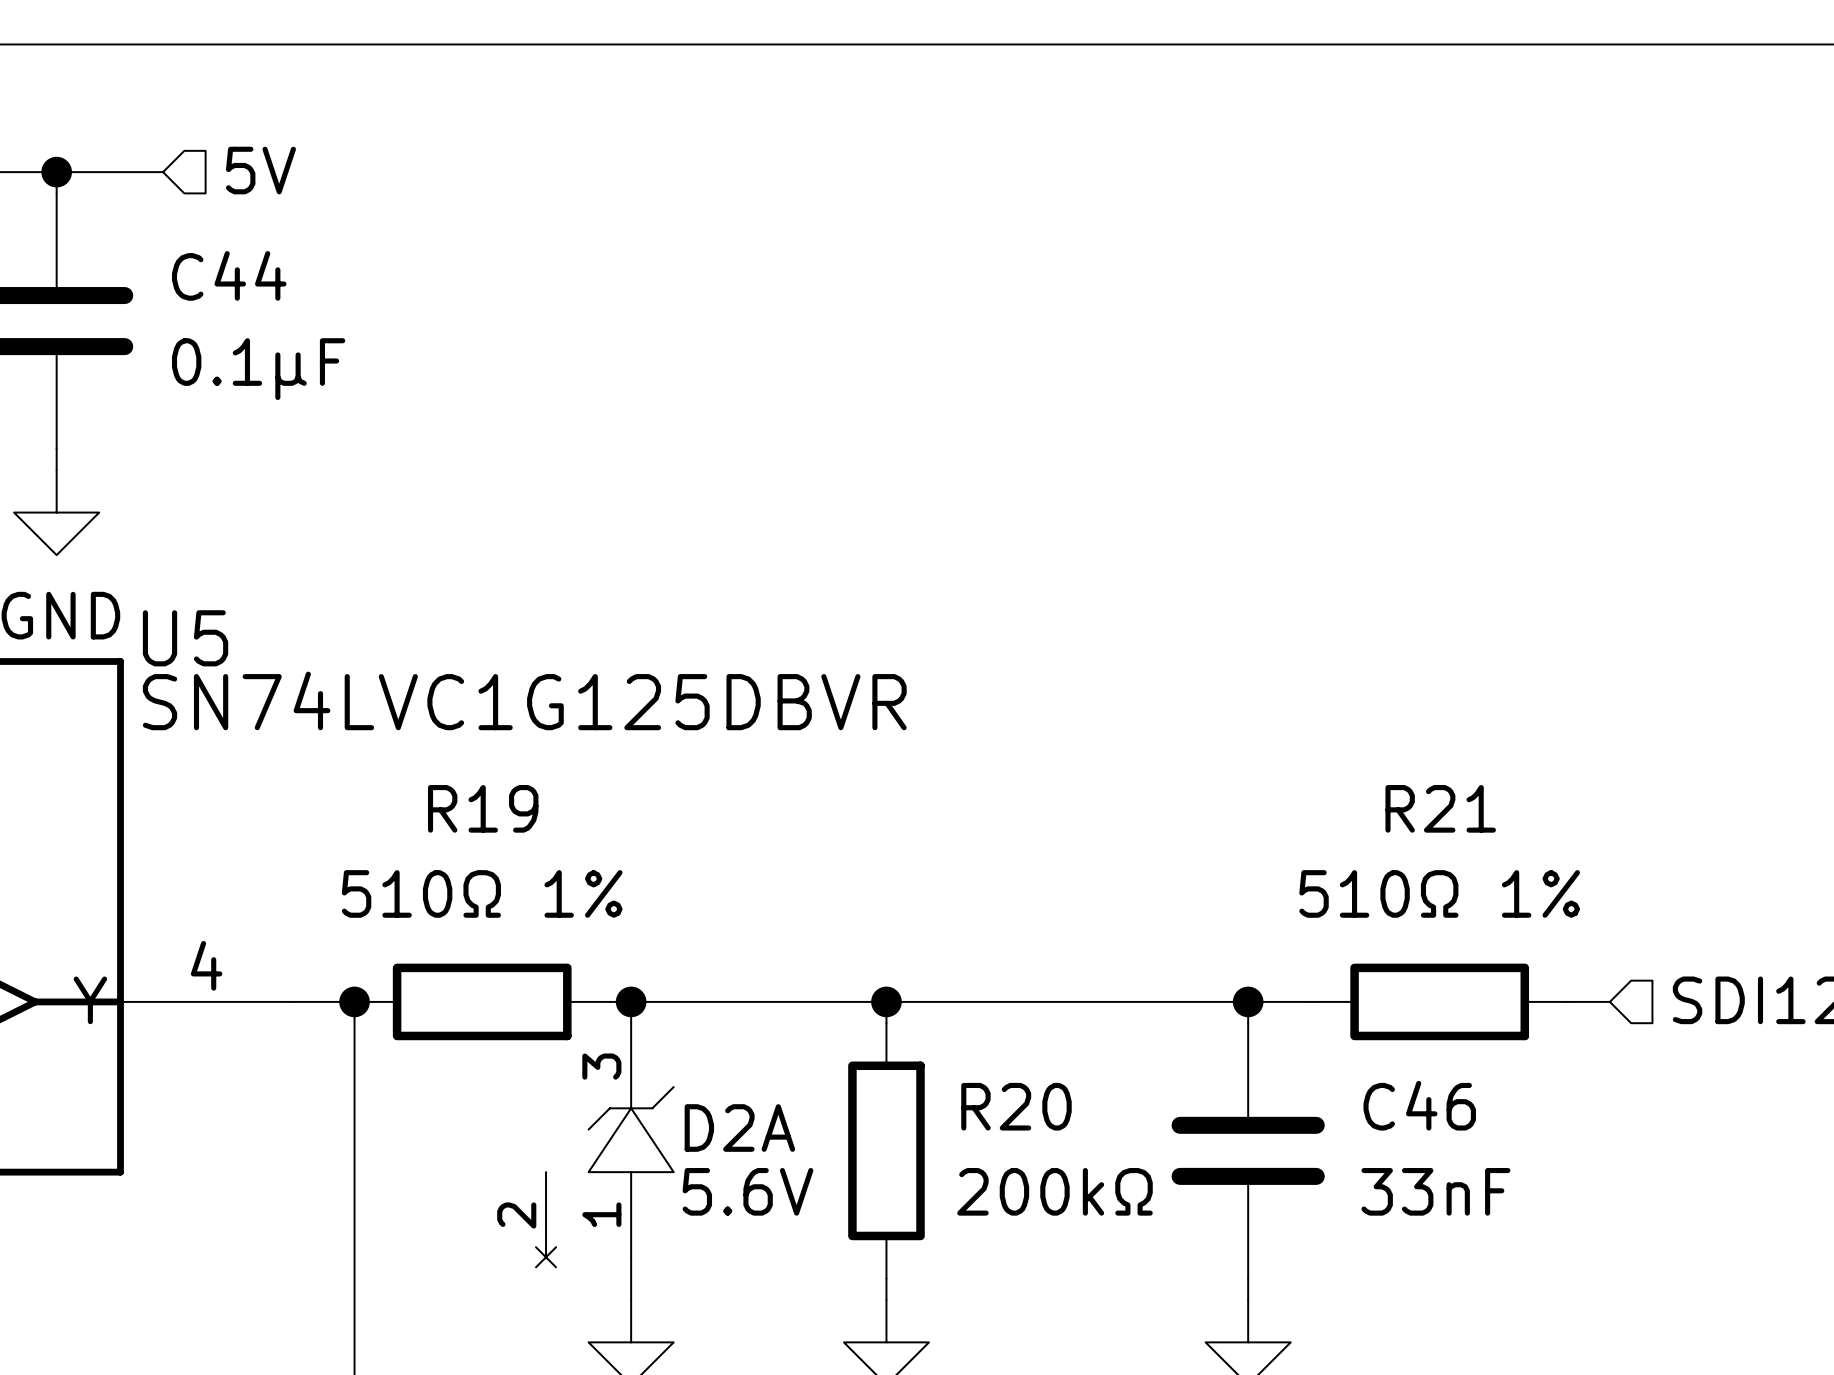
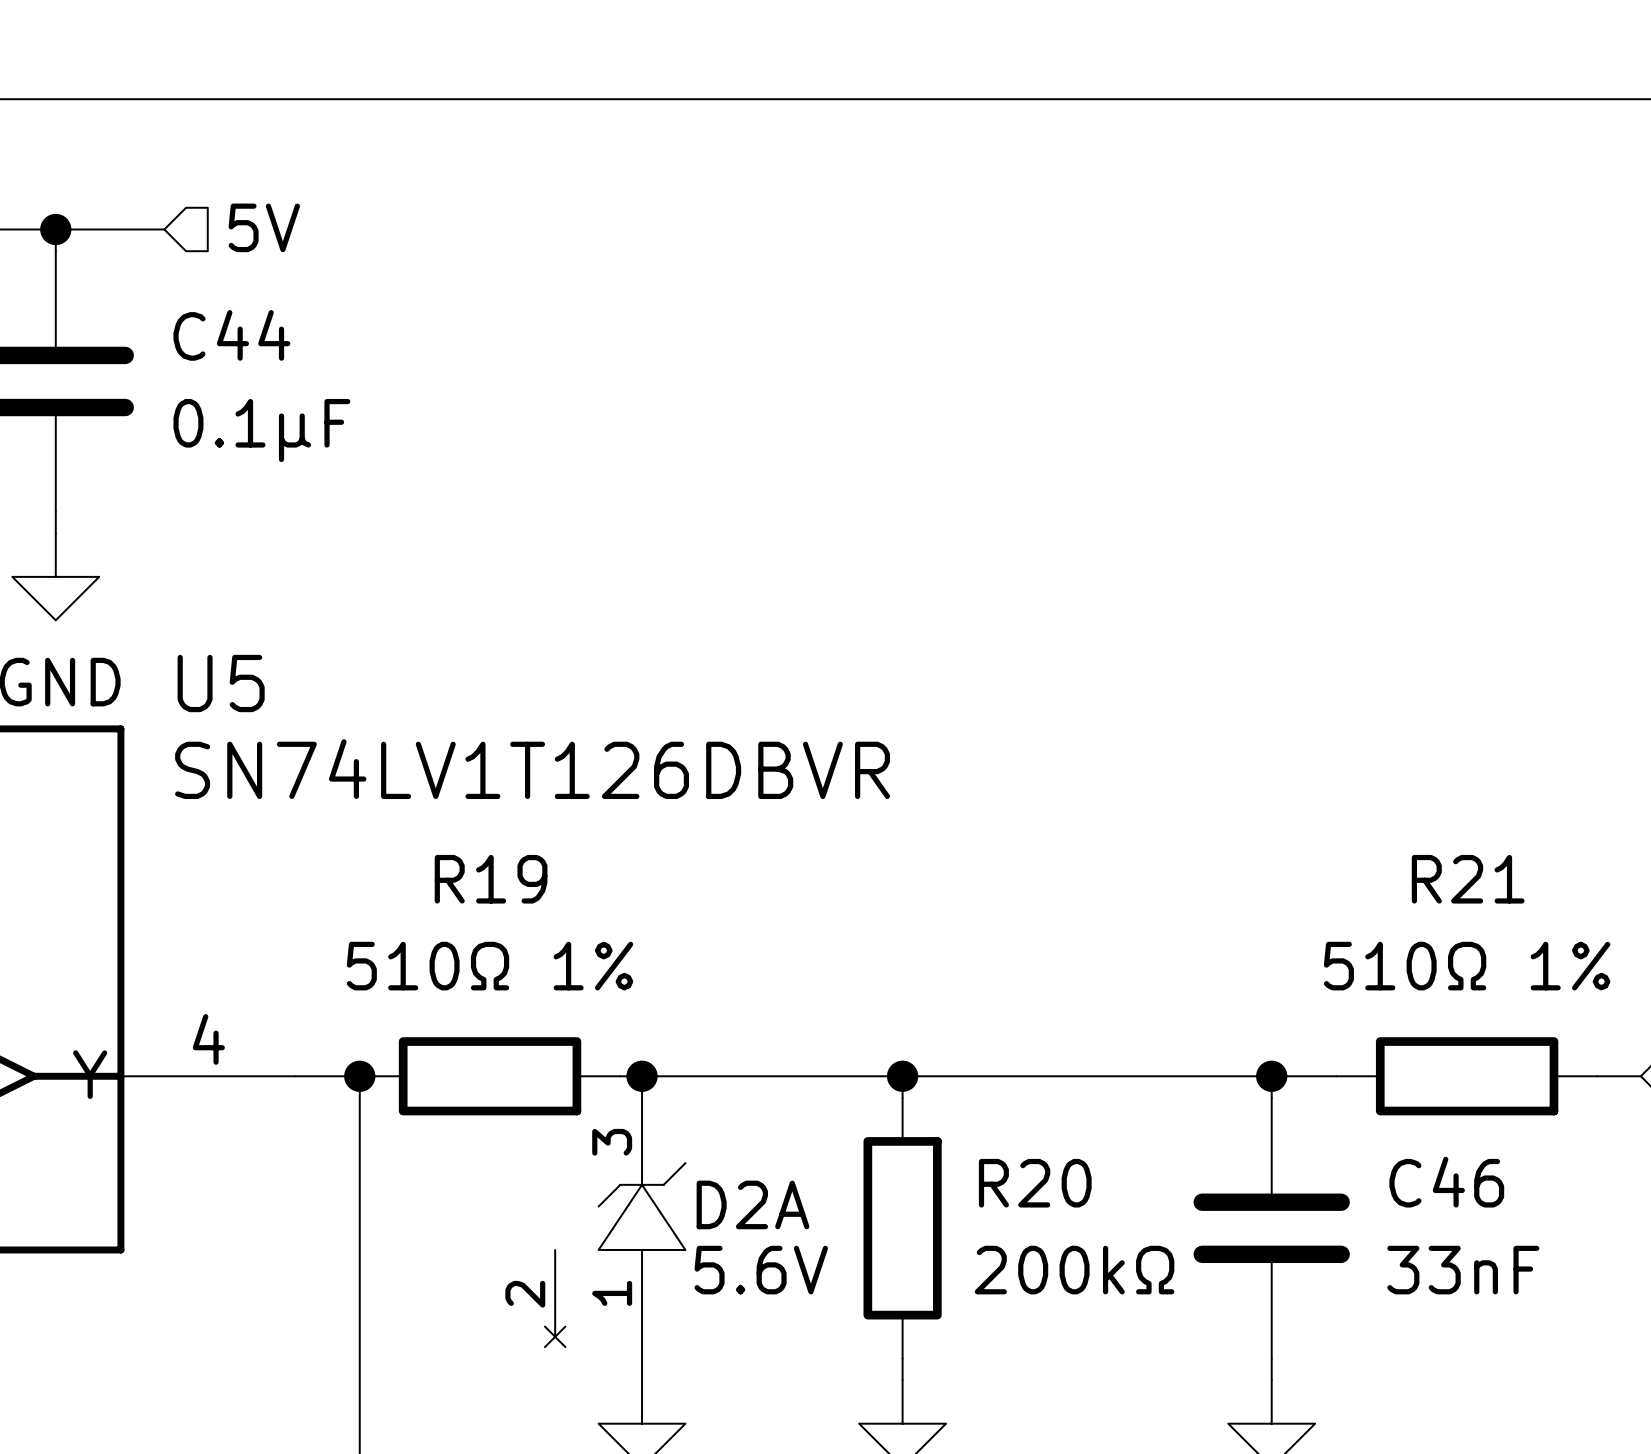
U5 name position: U5 (185, 638) -> U5 (221, 683)
U5 value: SN74LVC1G125DBVR (524, 700) -> SN74LV1T126DBVR (532, 769)

